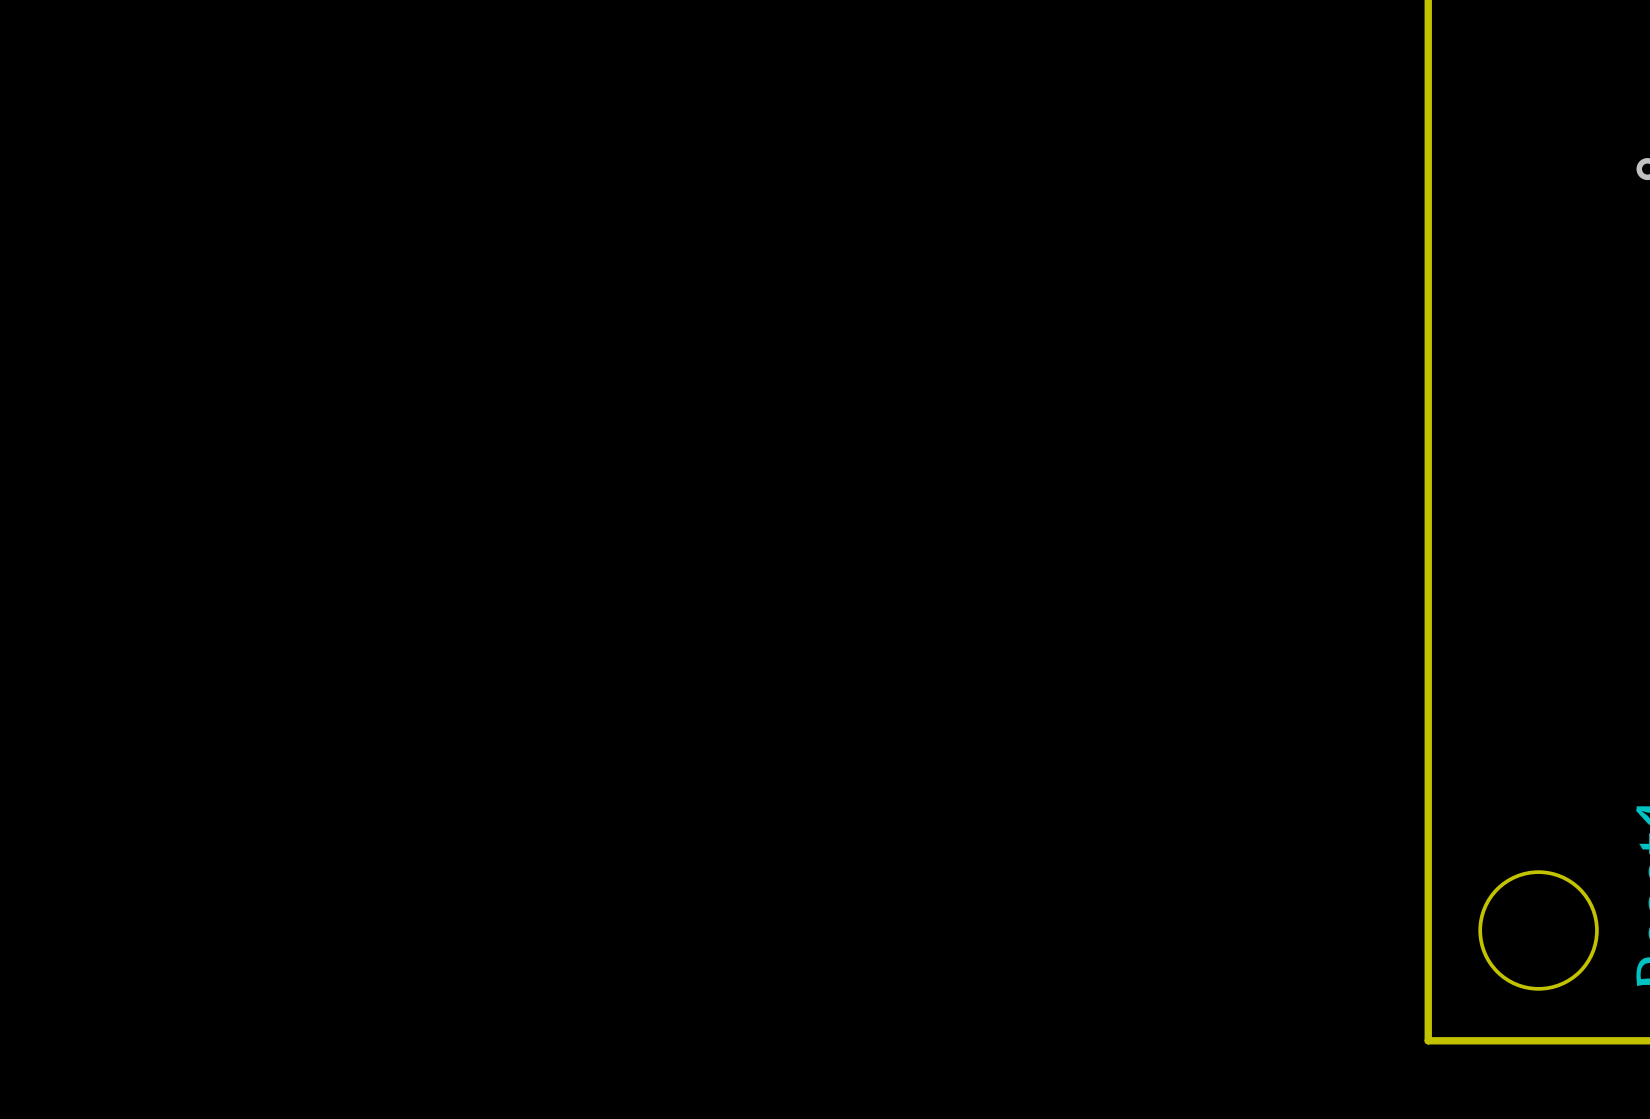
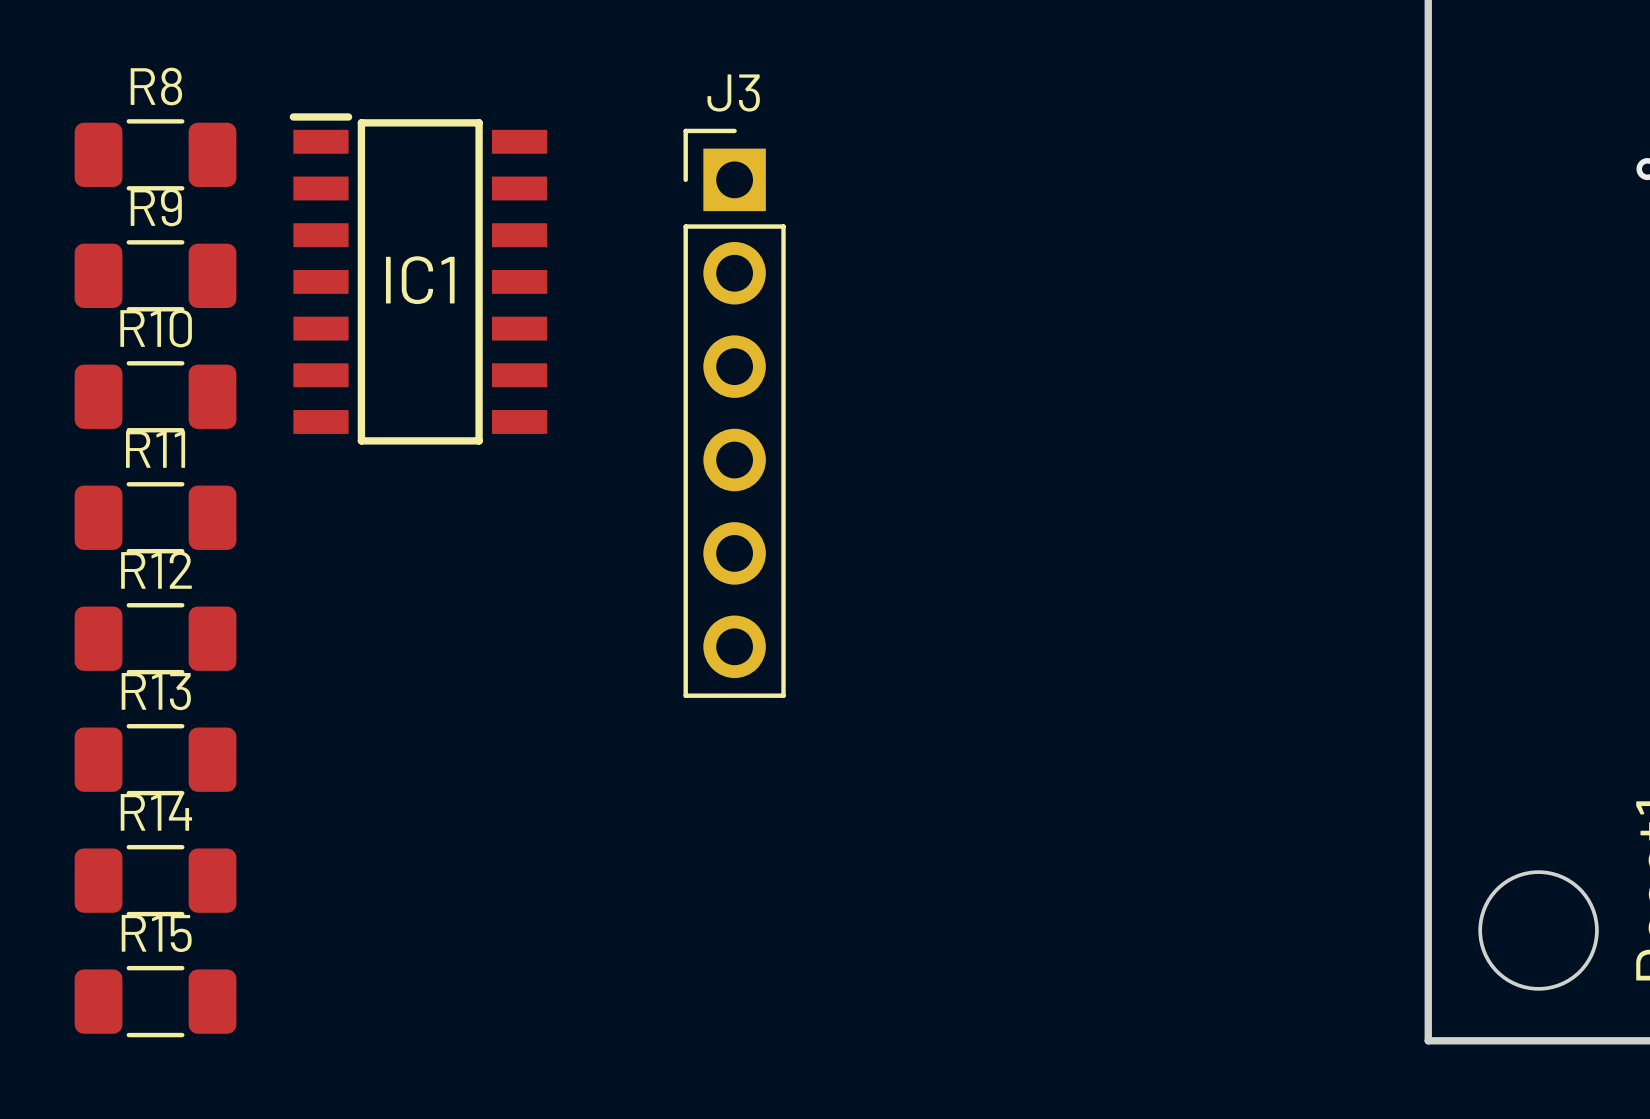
R8: none -> (155, 154)
R9: none -> (155, 275)
IC1: none -> (418, 278)
R10: none -> (155, 396)
J3: none -> (734, 413)
R11: none -> (155, 517)
R12: none -> (155, 638)
R13: none -> (155, 759)
R14: none -> (155, 880)
R15: none -> (155, 1001)

